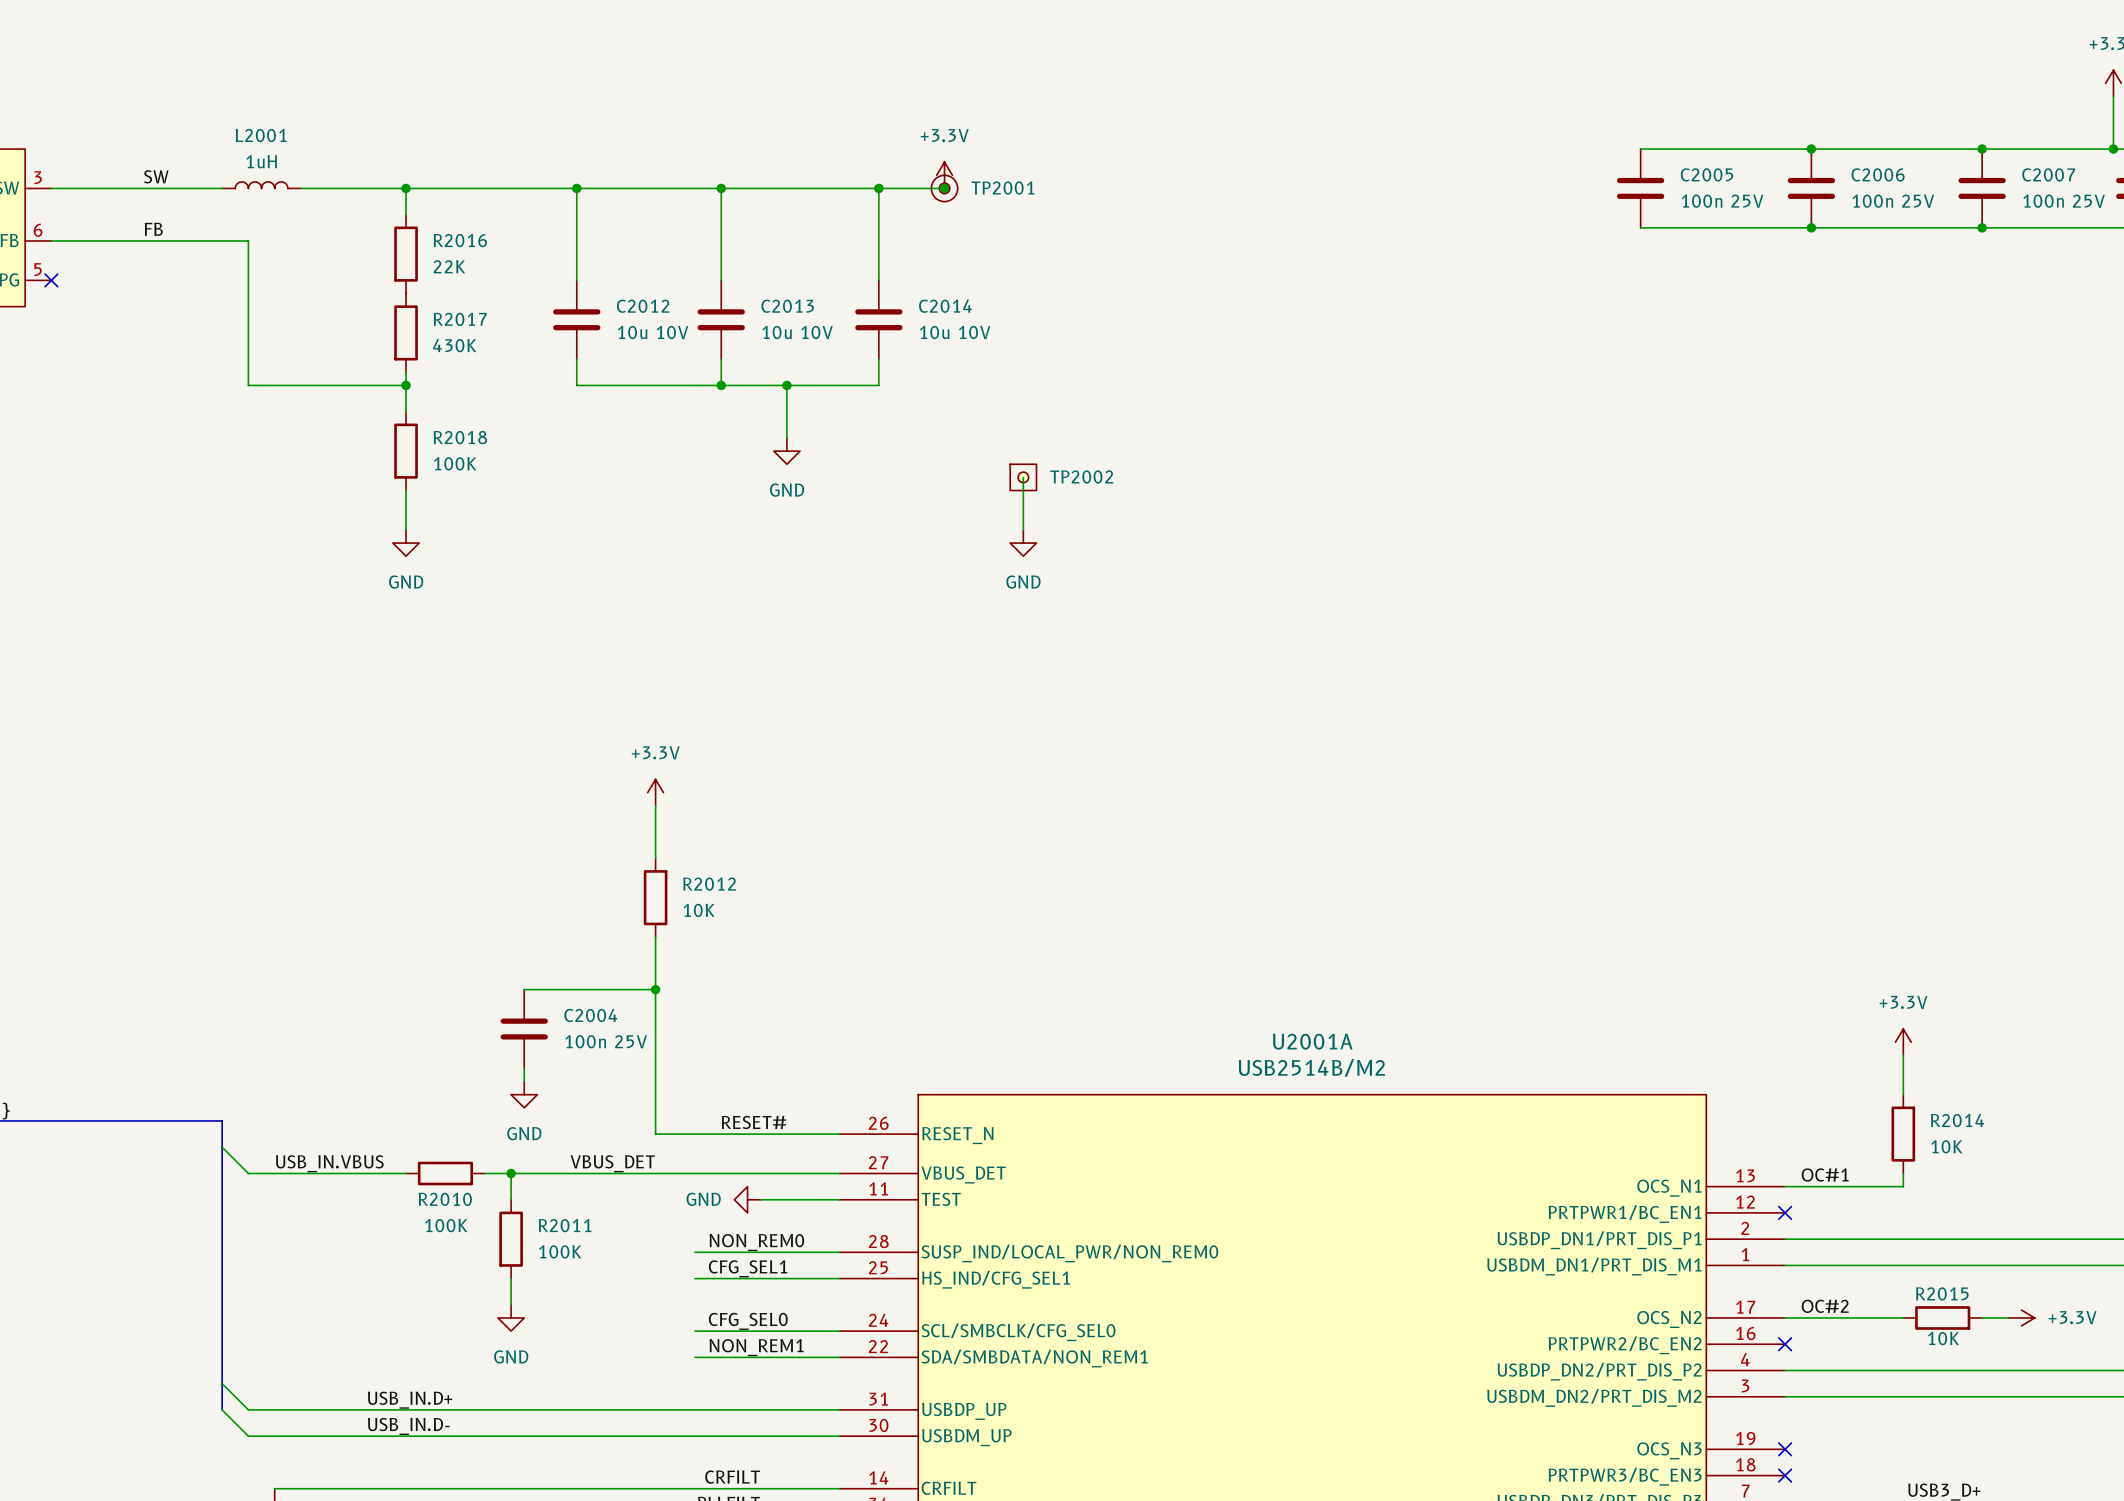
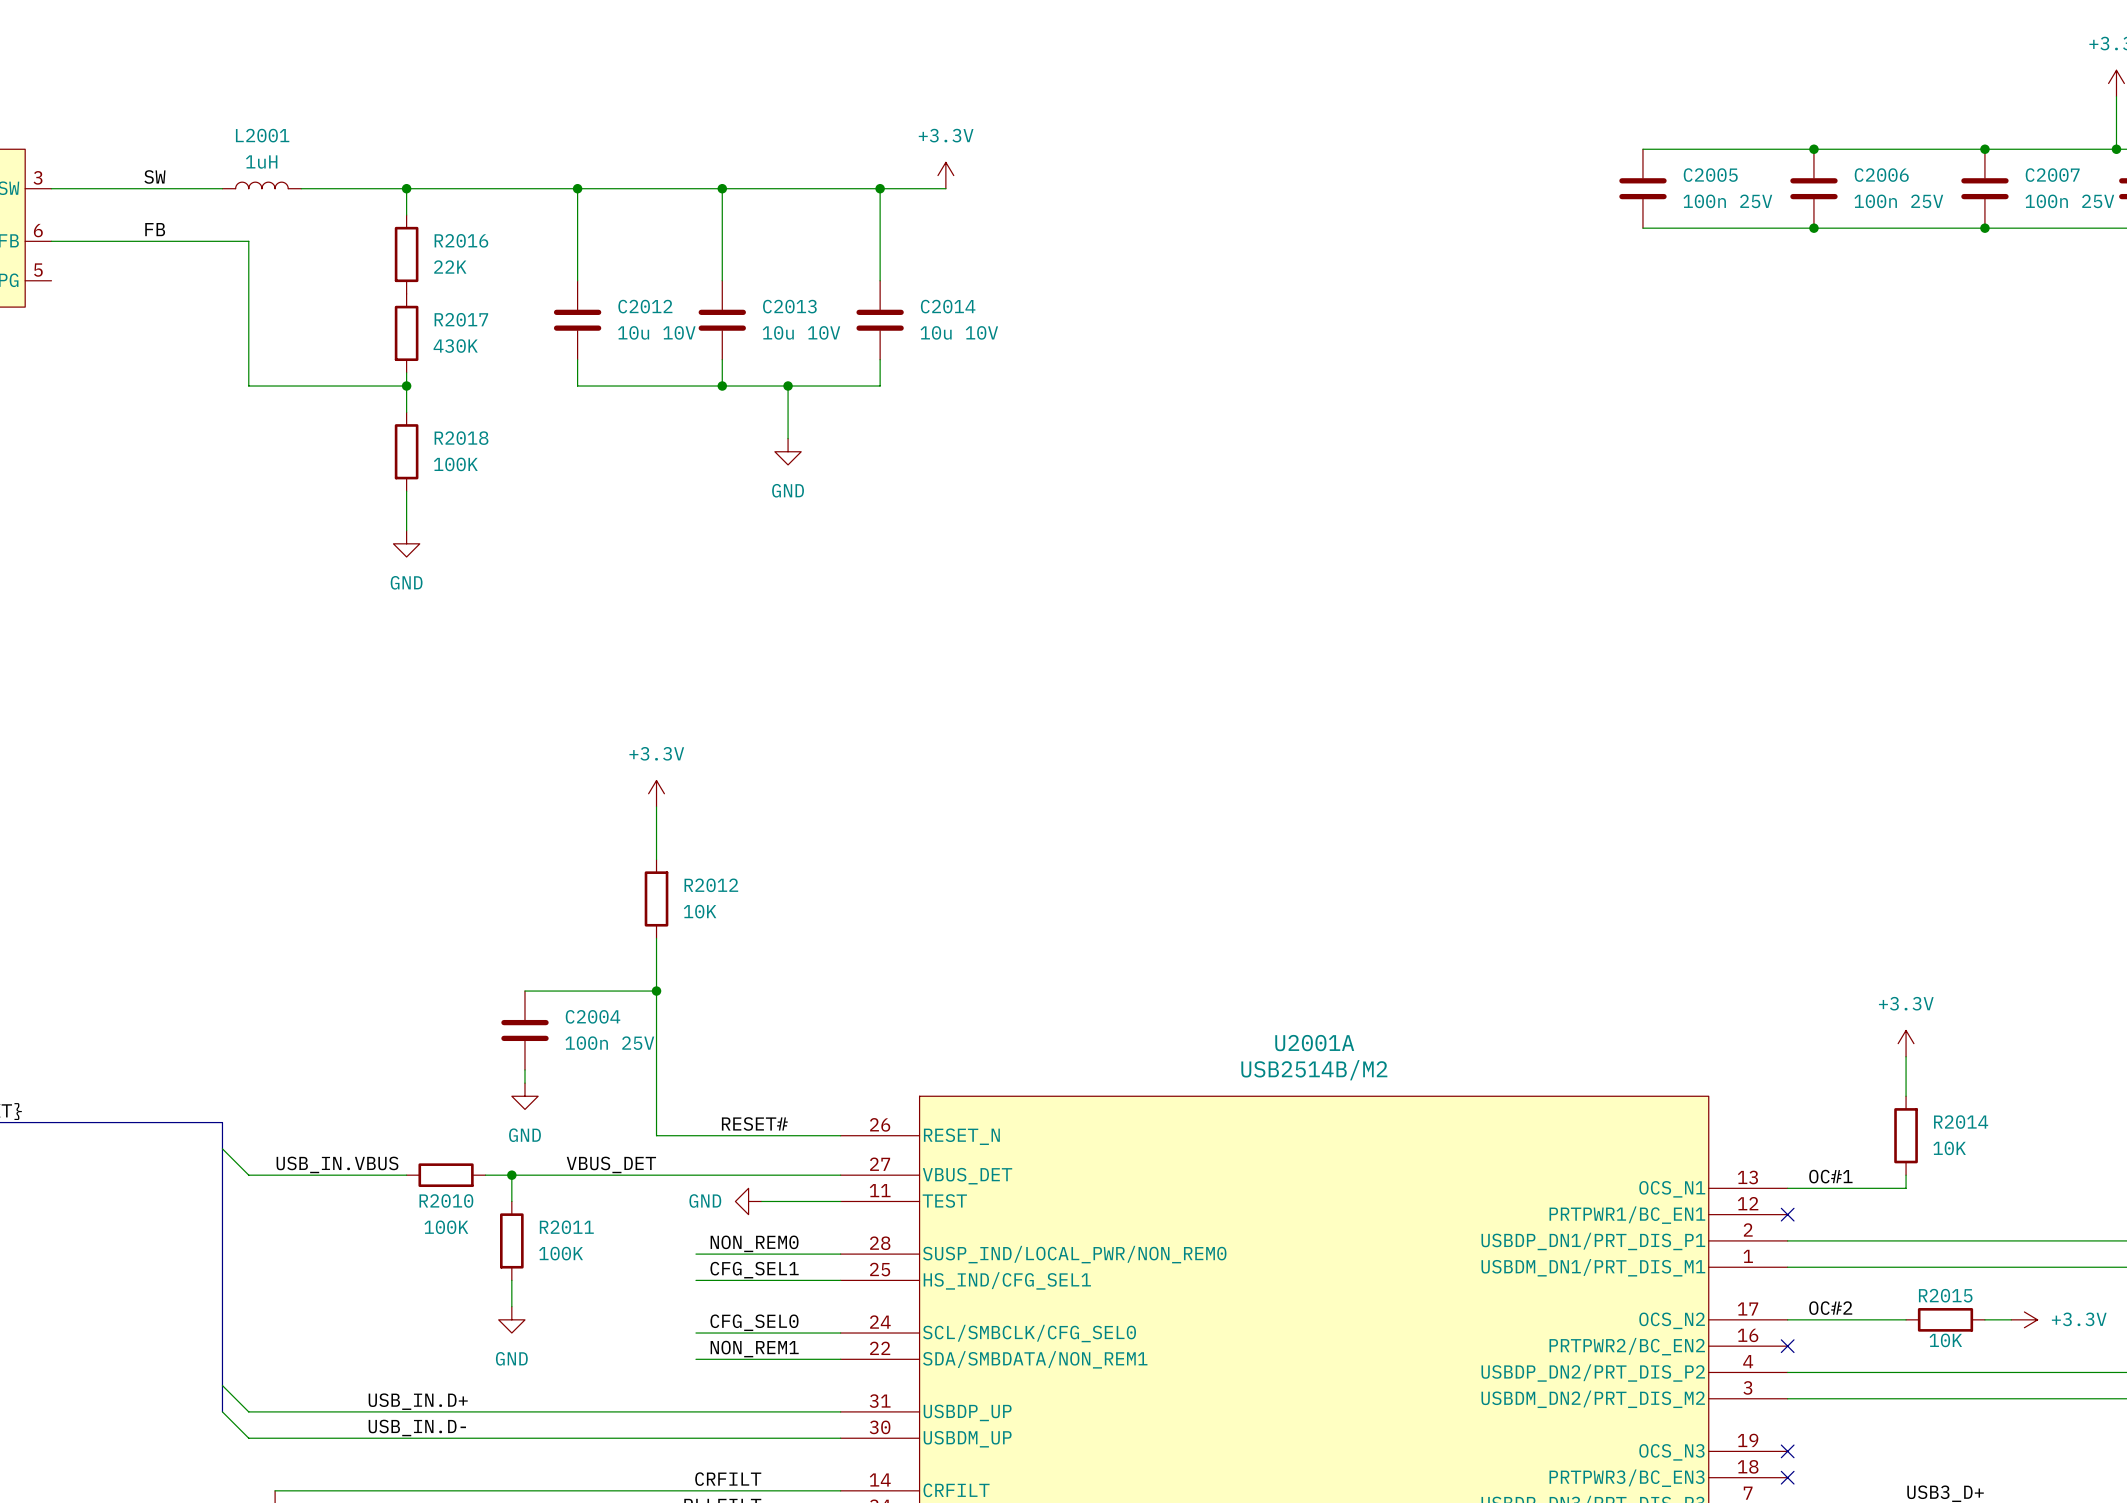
junction: (944, 188) -> none
TP2001: (944, 188) -> none
no-connect mark: (51, 280) -> none
wire: (1023, 477) (1023, 529) -> none
TP2002: (1023, 477) -> none
power symbol: GND (1023, 543) -> none

